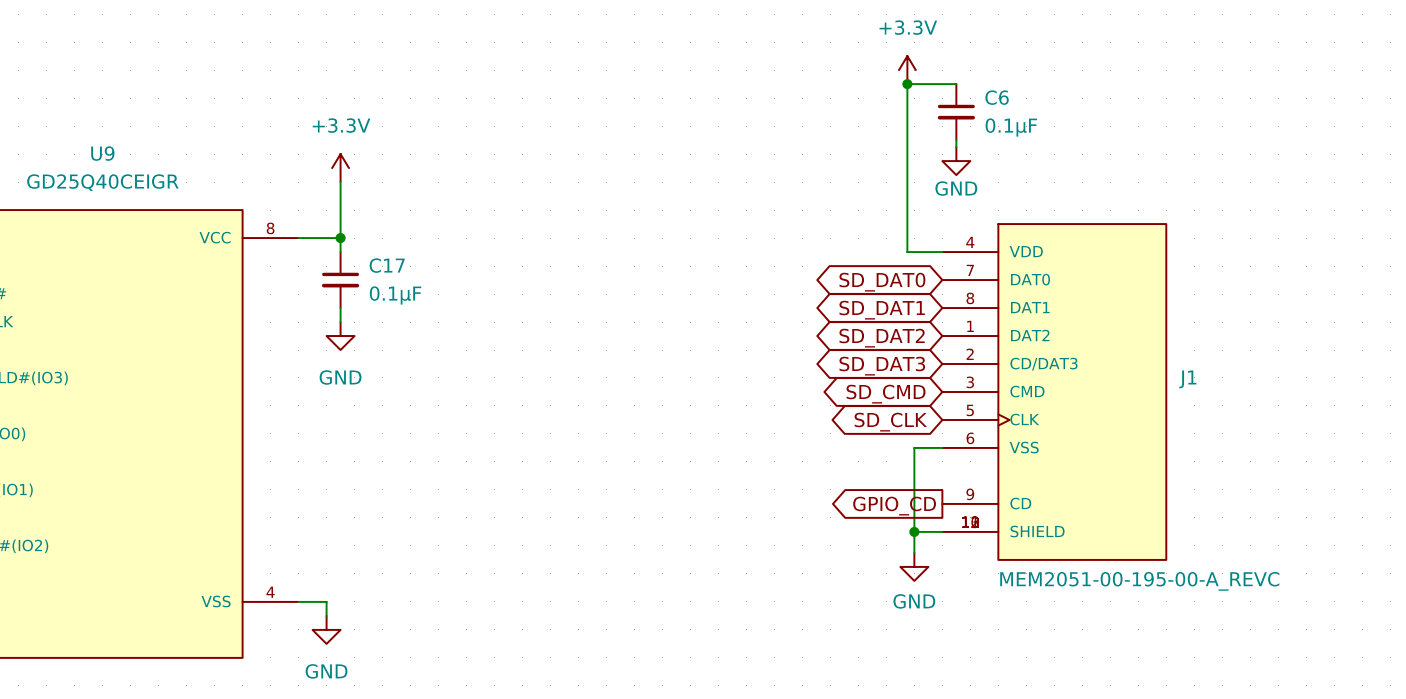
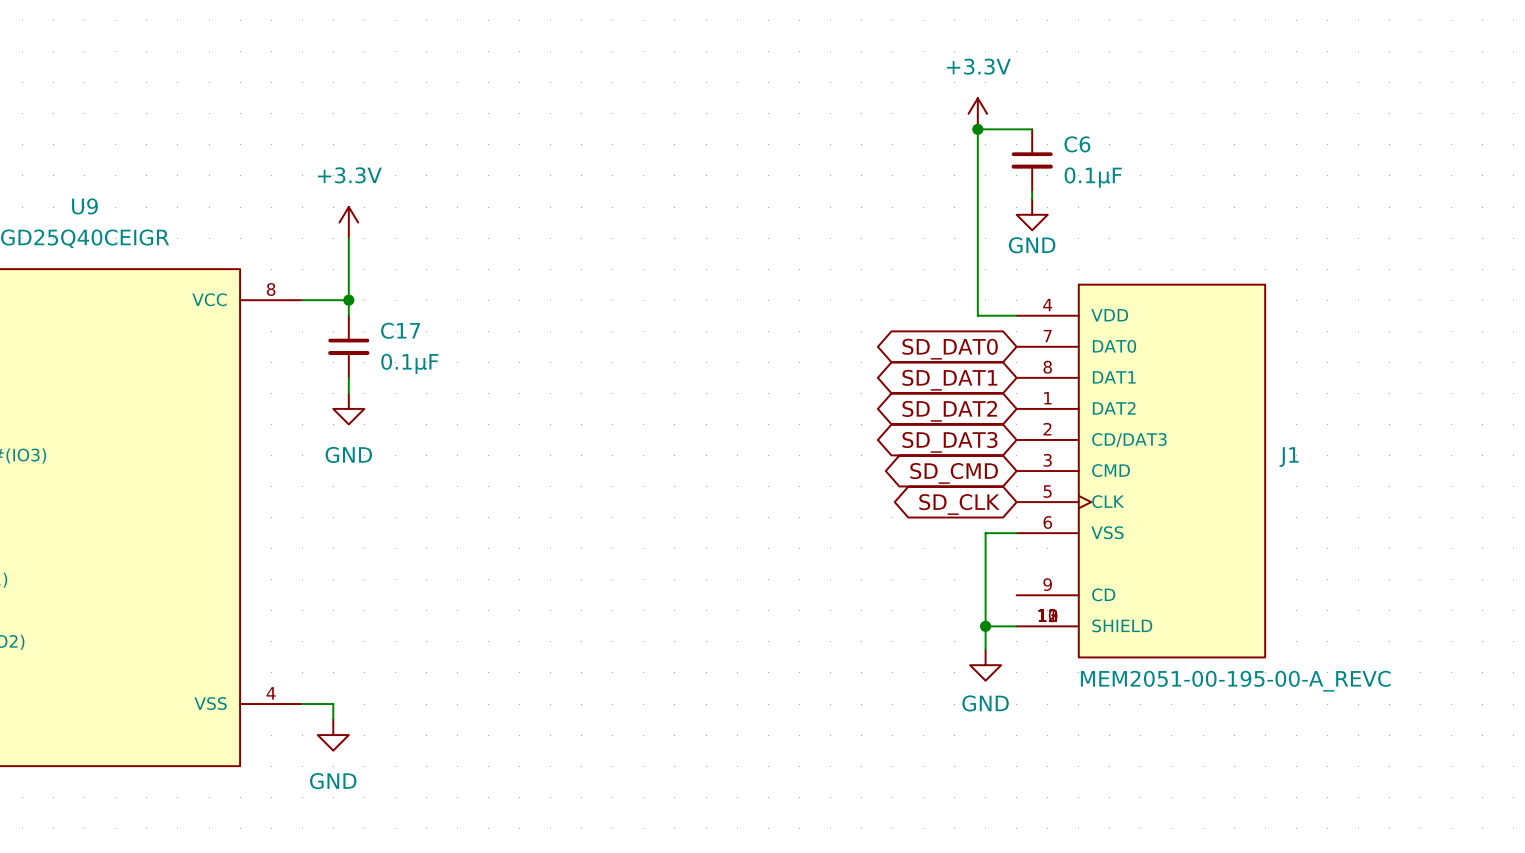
global label: GPIO_CD (894, 506) -> none

